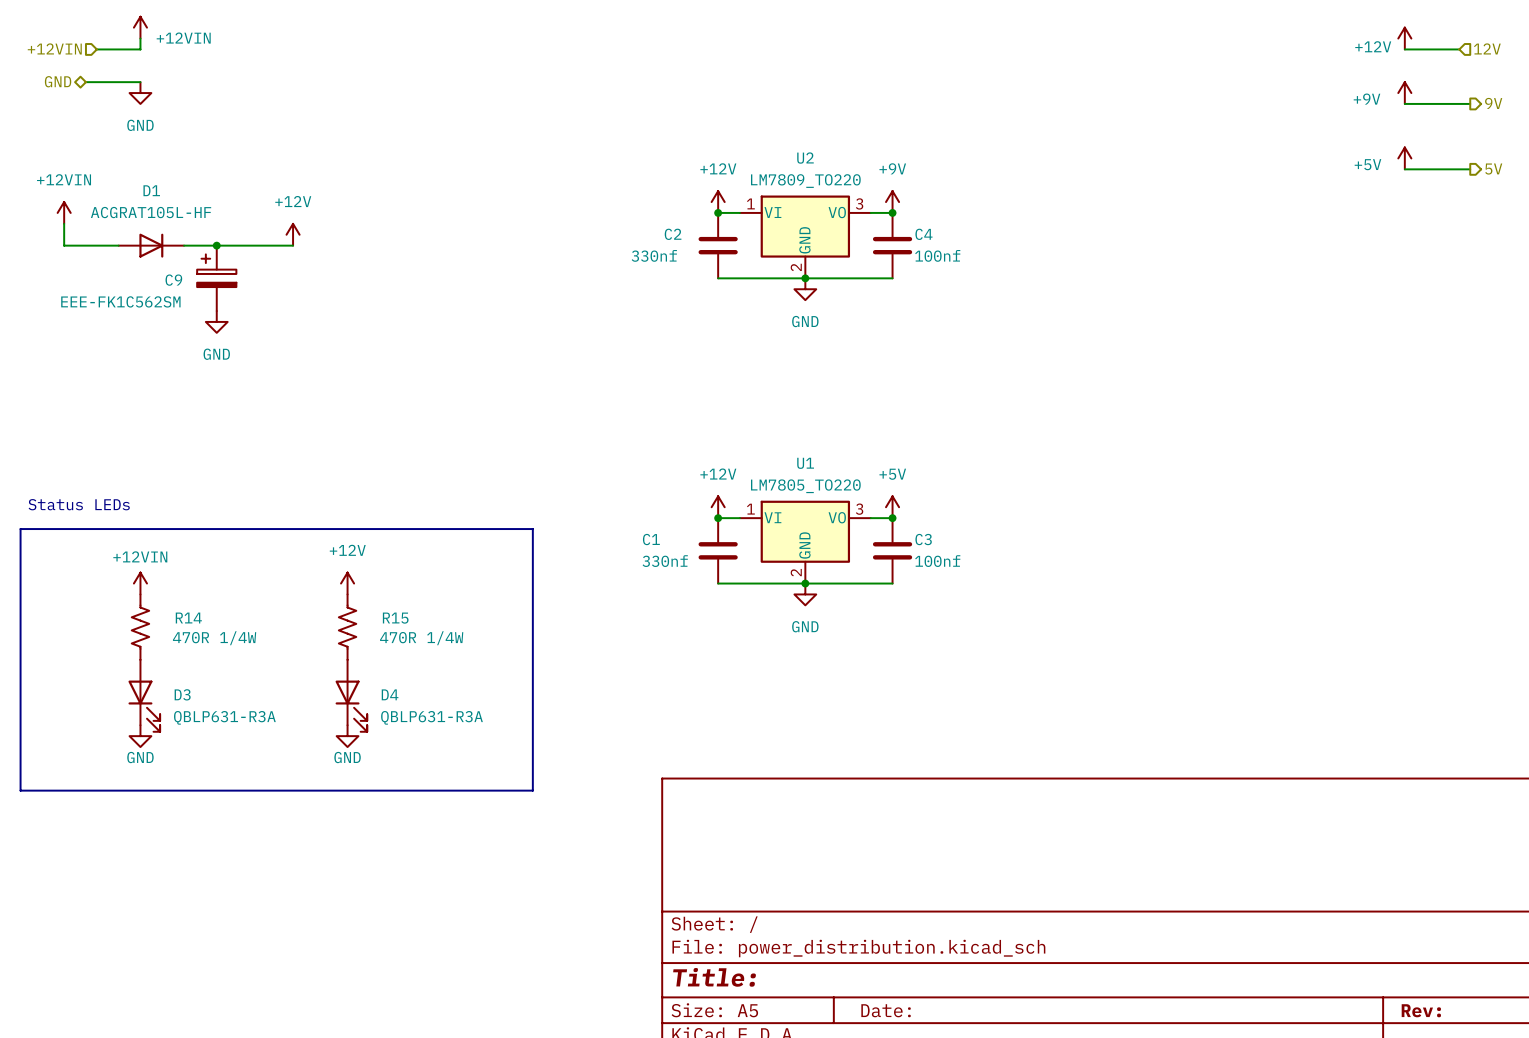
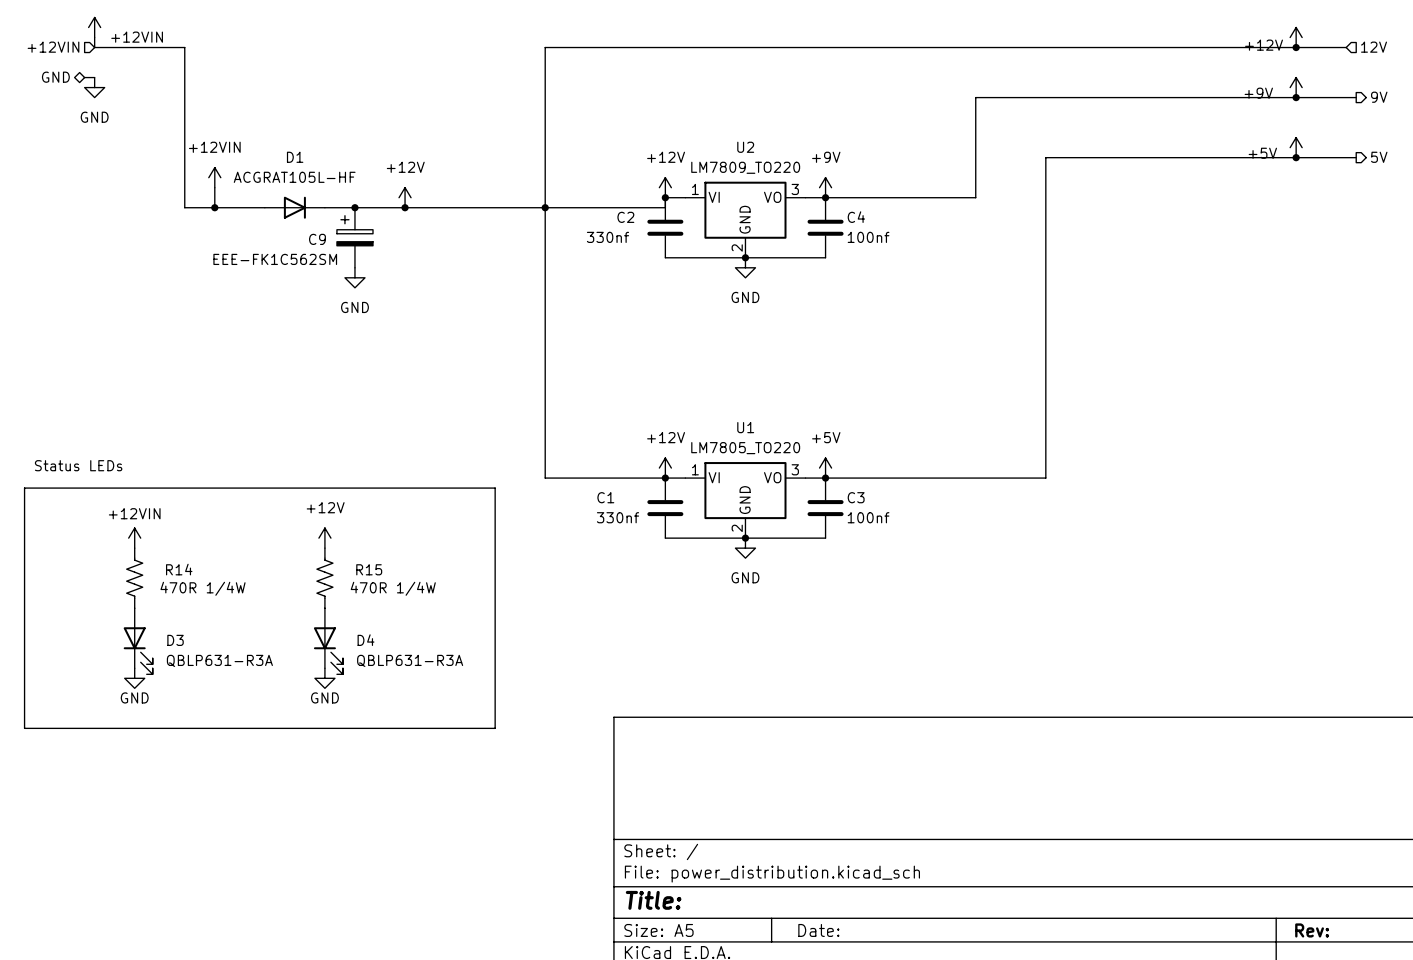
power symbol position: +12VIN (140, 27) -> +12VIN (94, 27)
wire: none -> (94, 37) (94, 47)
wire: (140, 38) (140, 49) -> (264, 207) (184, 207) (184, 47) (134, 47)
wire: none -> (1296, 47) (545, 47) (545, 478) (665, 478)
junction: none -> (1296, 47)
wire: (96, 82) (140, 82) -> none
power symbol position: GND (140, 93) -> GND (94, 87)
wire: none -> (1296, 97) (975, 97) (975, 197) (825, 197)
junction: none -> (1296, 97)
wire: none -> (1296, 157) (1045, 157) (1045, 478) (825, 478)
junction: none -> (1296, 157)
power symbol: none -> +12VIN (214, 177)
wire: none -> (214, 187) (214, 207)
power symbol: +12VIN (64, 212) -> none
wire: none -> (665, 197) (665, 207) (324, 207)
wire: (64, 223) (64, 245) (118, 245) -> none
junction: none -> (354, 207)
junction: none -> (405, 207)
junction: none -> (545, 207)
power symbol position: +12V (293, 234) -> +12V (405, 197)
D1 position: (151, 245) -> (294, 207)
wire: (184, 245) (293, 245) -> none
junction position: (216, 245) -> (214, 207)
C9 position: (216, 278) -> (354, 237)
power symbol: none -> GND (354, 277)
power symbol: GND (216, 321) -> none

